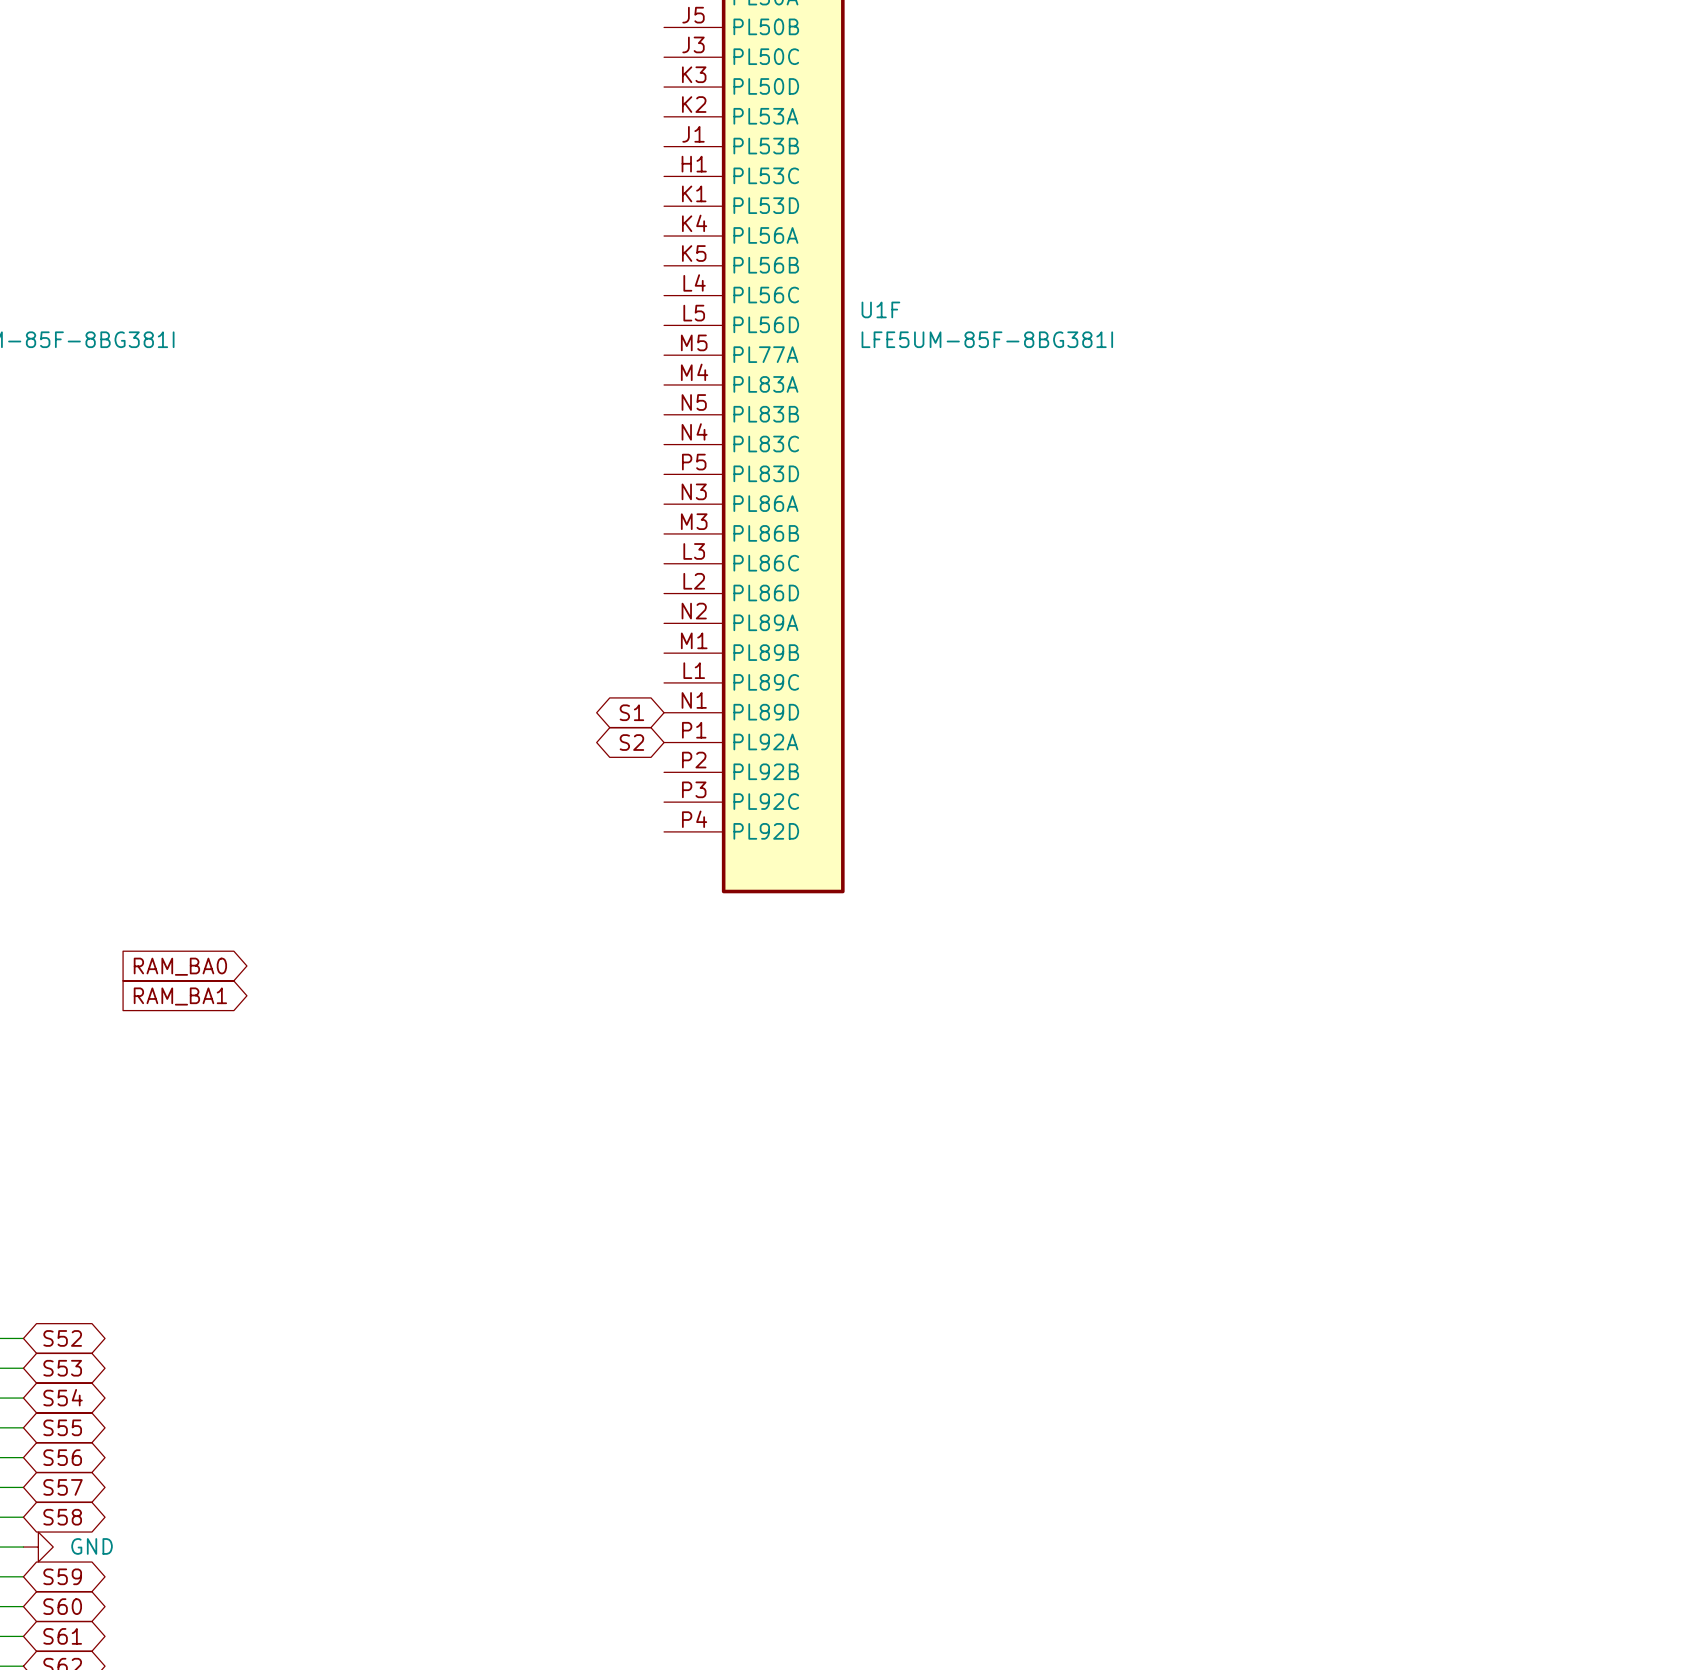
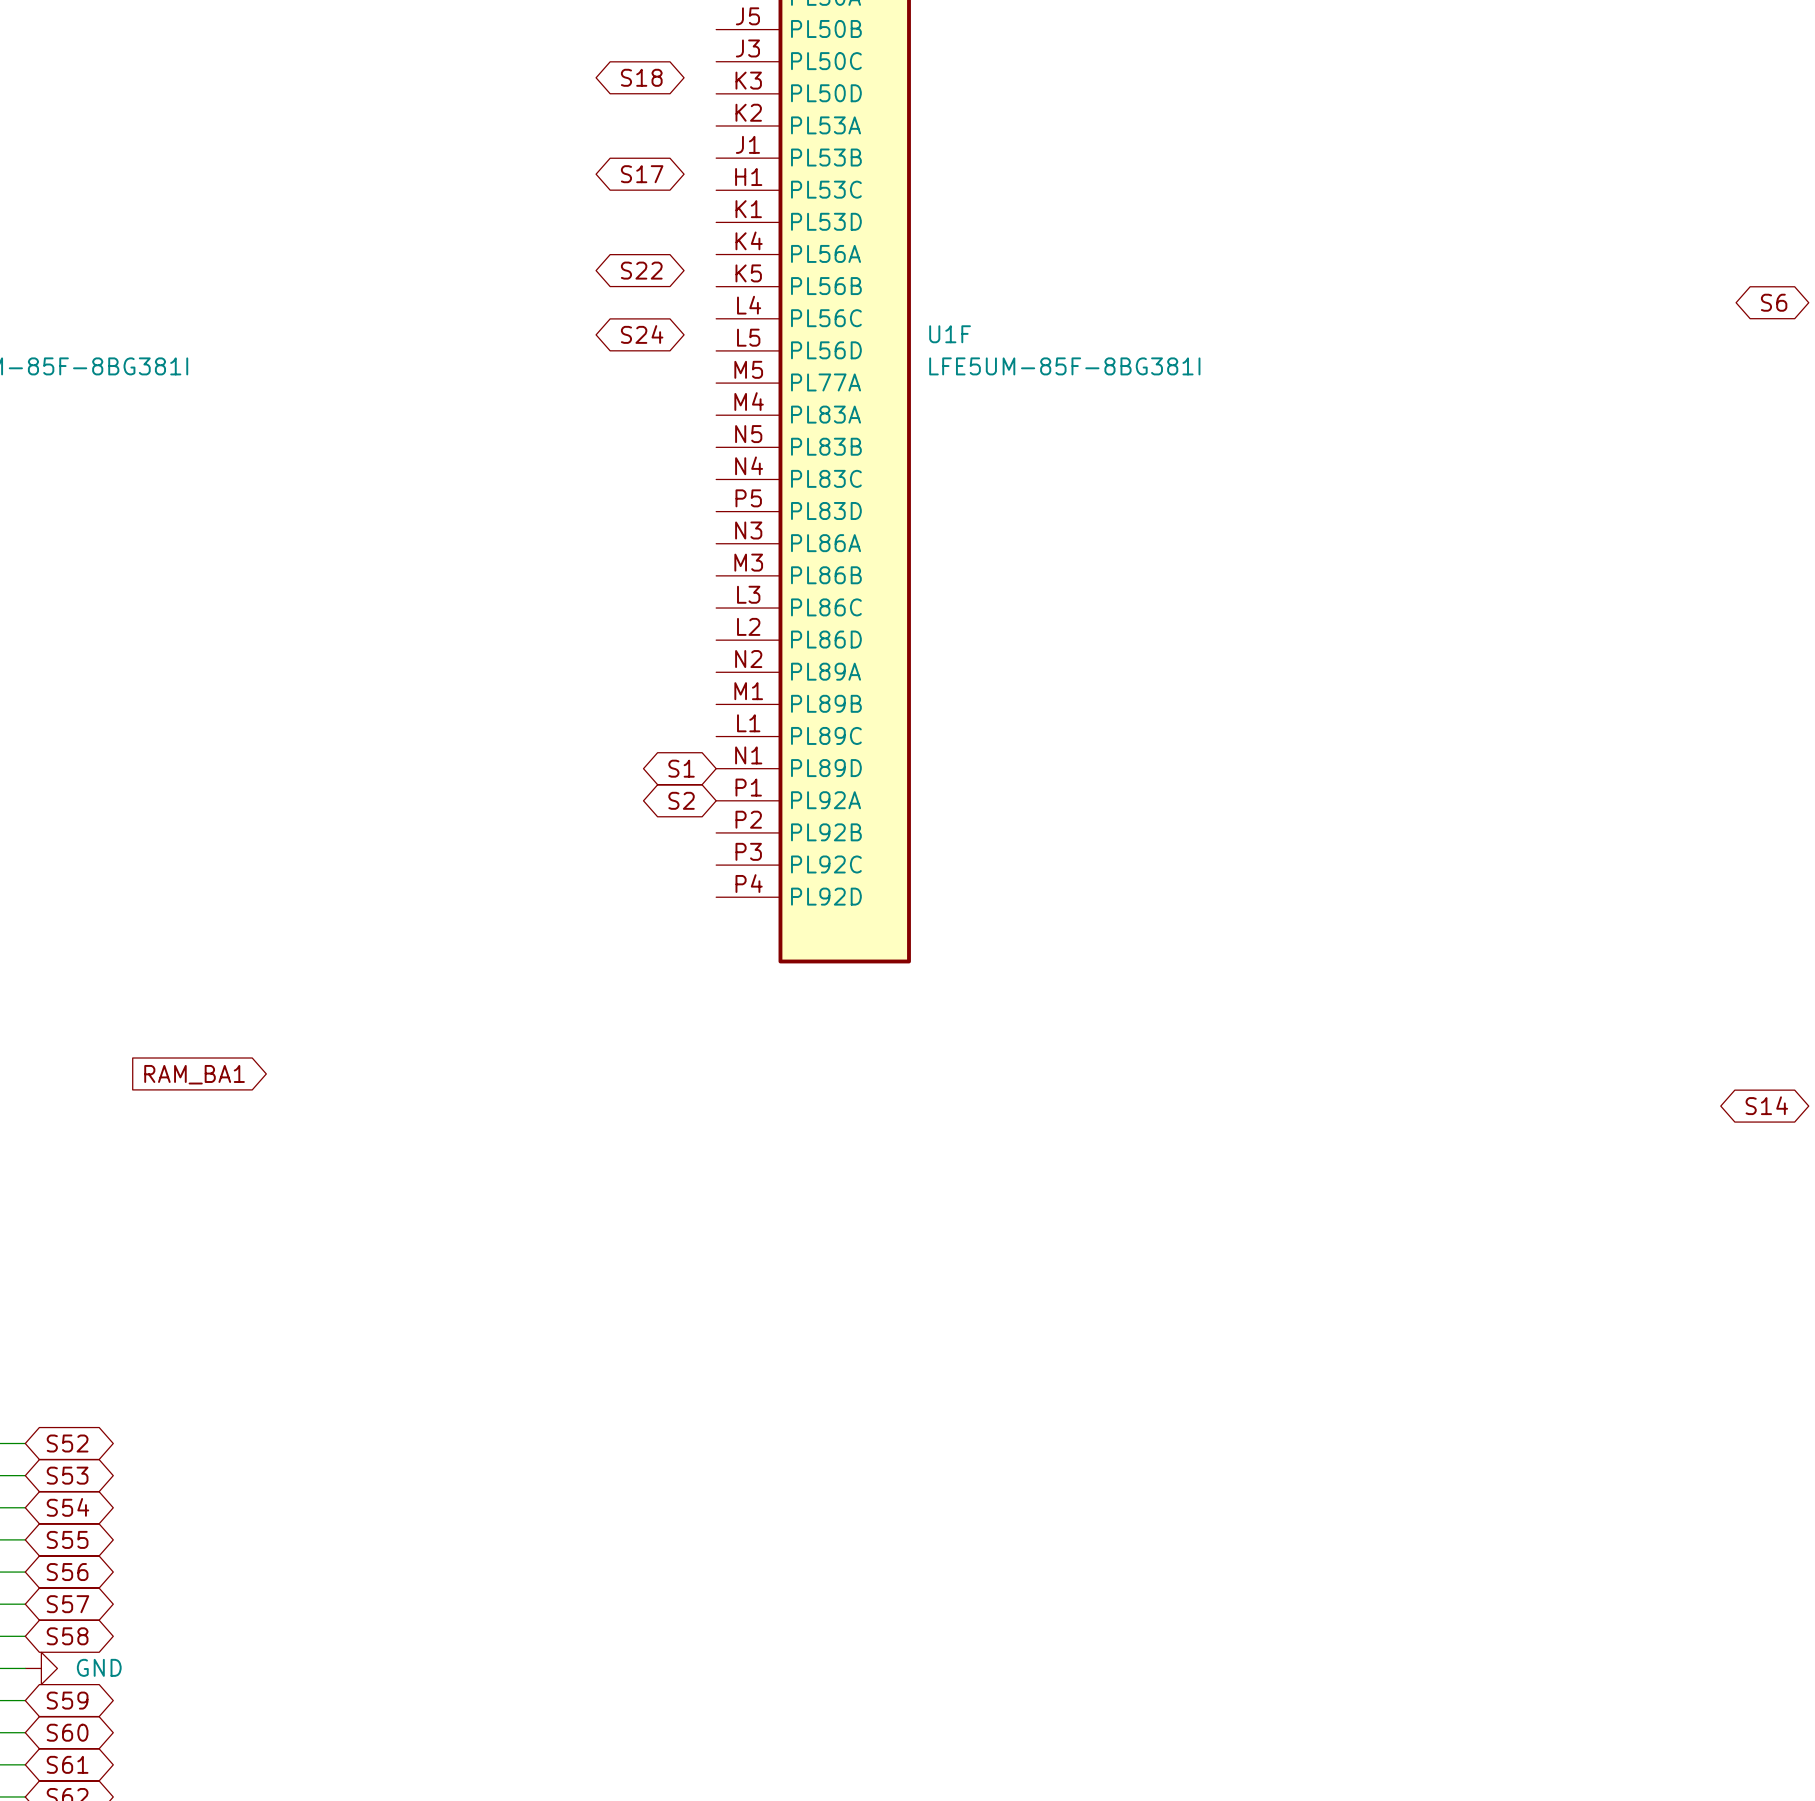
global label: none -> S18 (641, 77)
global label: none -> S17 (642, 174)
global label: none -> S22 (641, 270)
global label: none -> S6 (1774, 302)
global label: none -> S24 (642, 334)
global label: RAM_BA0 (180, 966) -> none
global label: none -> S14 (1766, 1105)

